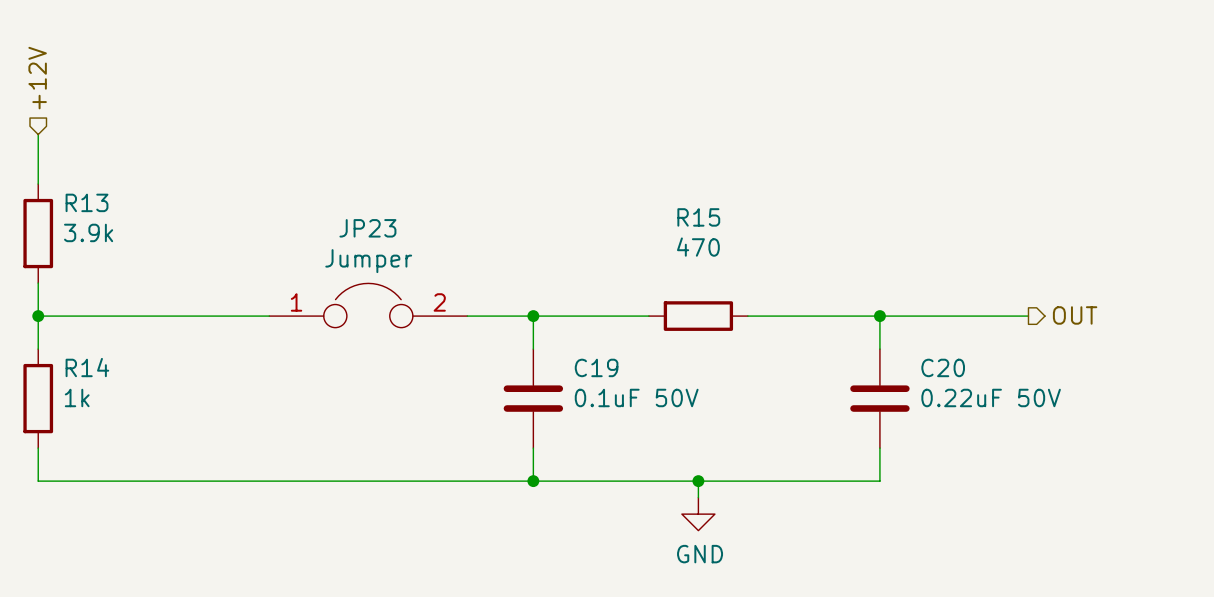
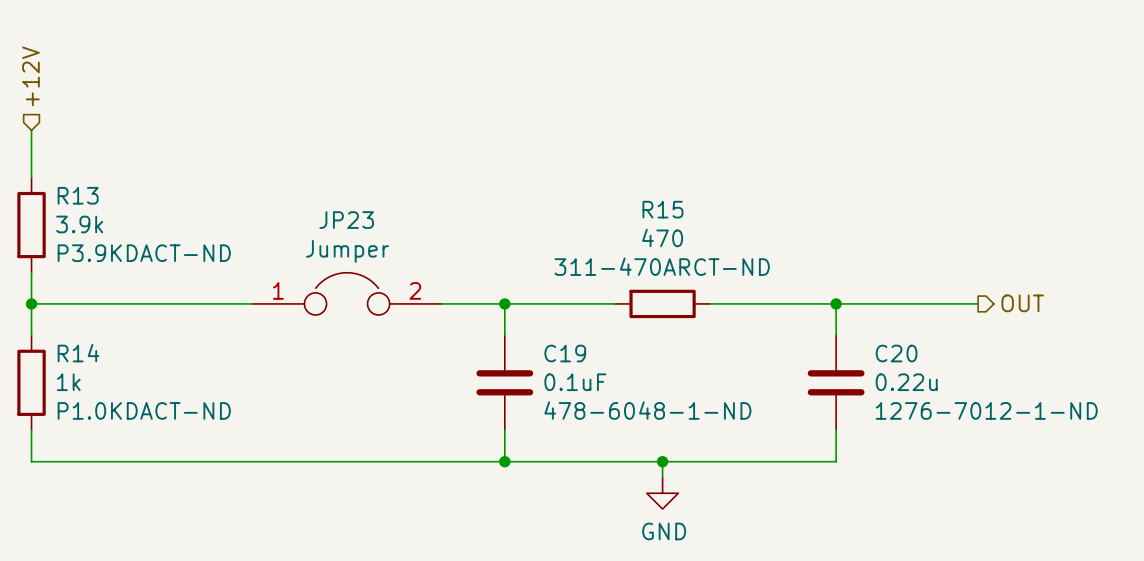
R13 text: none -> P3.9KDACT-ND (144, 253)
R15 text: none -> 311-470ARCT-ND (662, 266)
C19 value: 0.1uF 50V (636, 397) -> 0.1uF (575, 382)
C20 value: 0.22uF 50V (991, 397) -> 0.22u (906, 382)
C19 text: none -> 478-6048-1-ND (647, 410)
R14 text: none -> P1.0KDACT-ND (144, 410)
C20 text: none -> 1276-7012-1-ND (986, 410)

